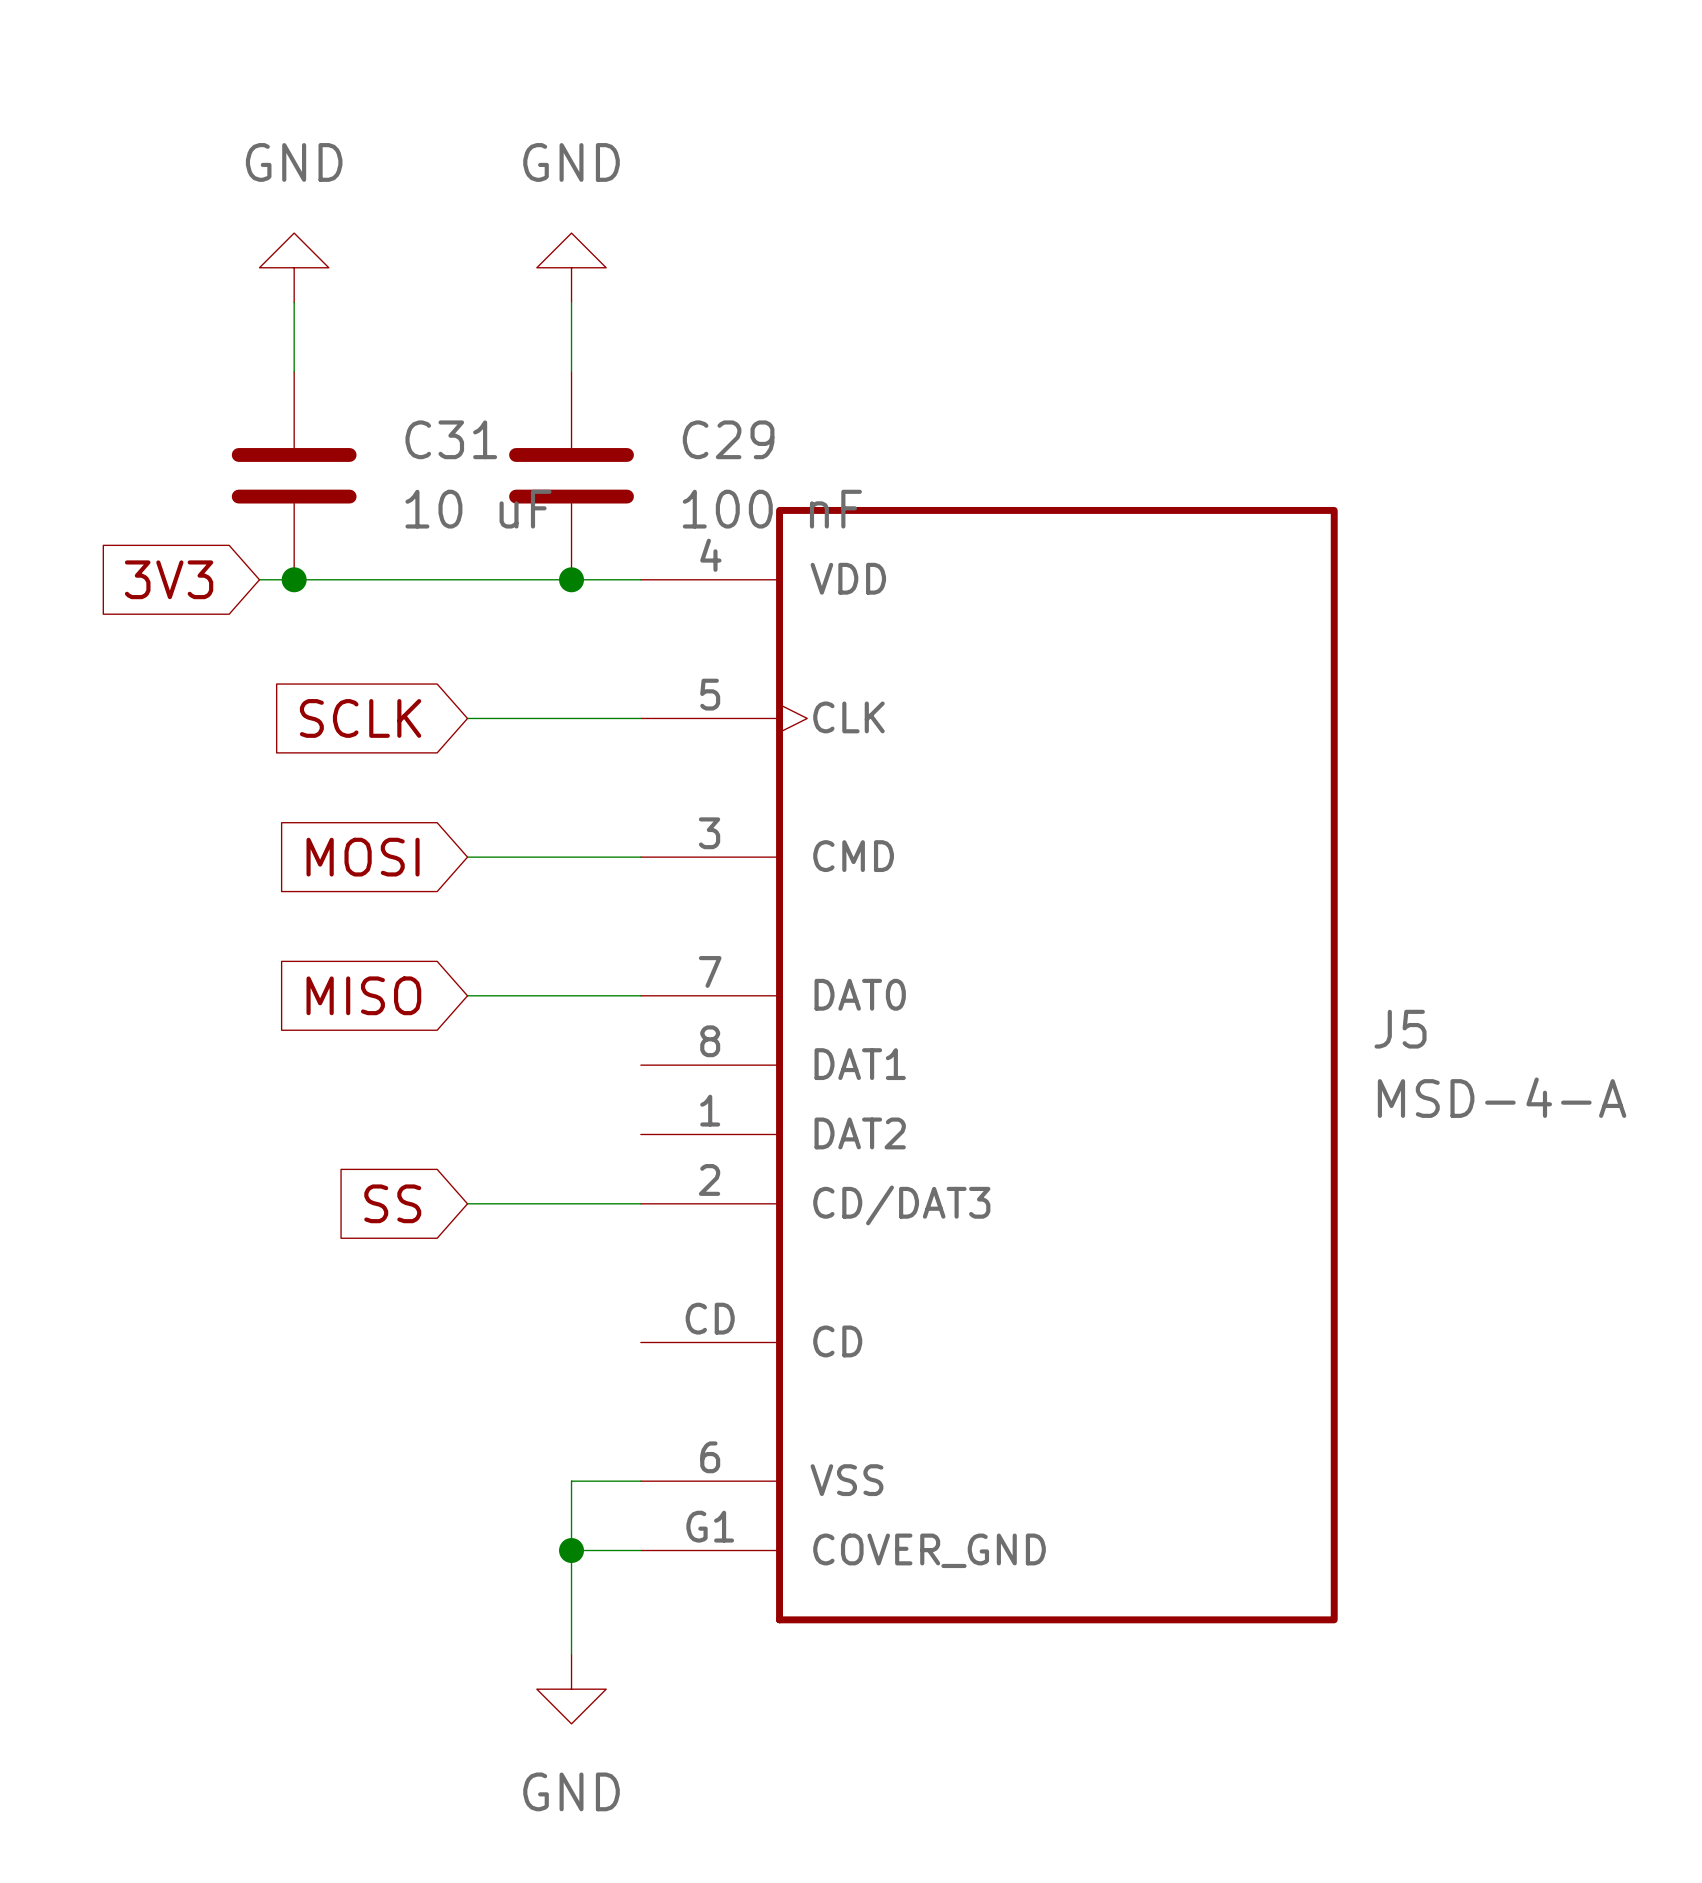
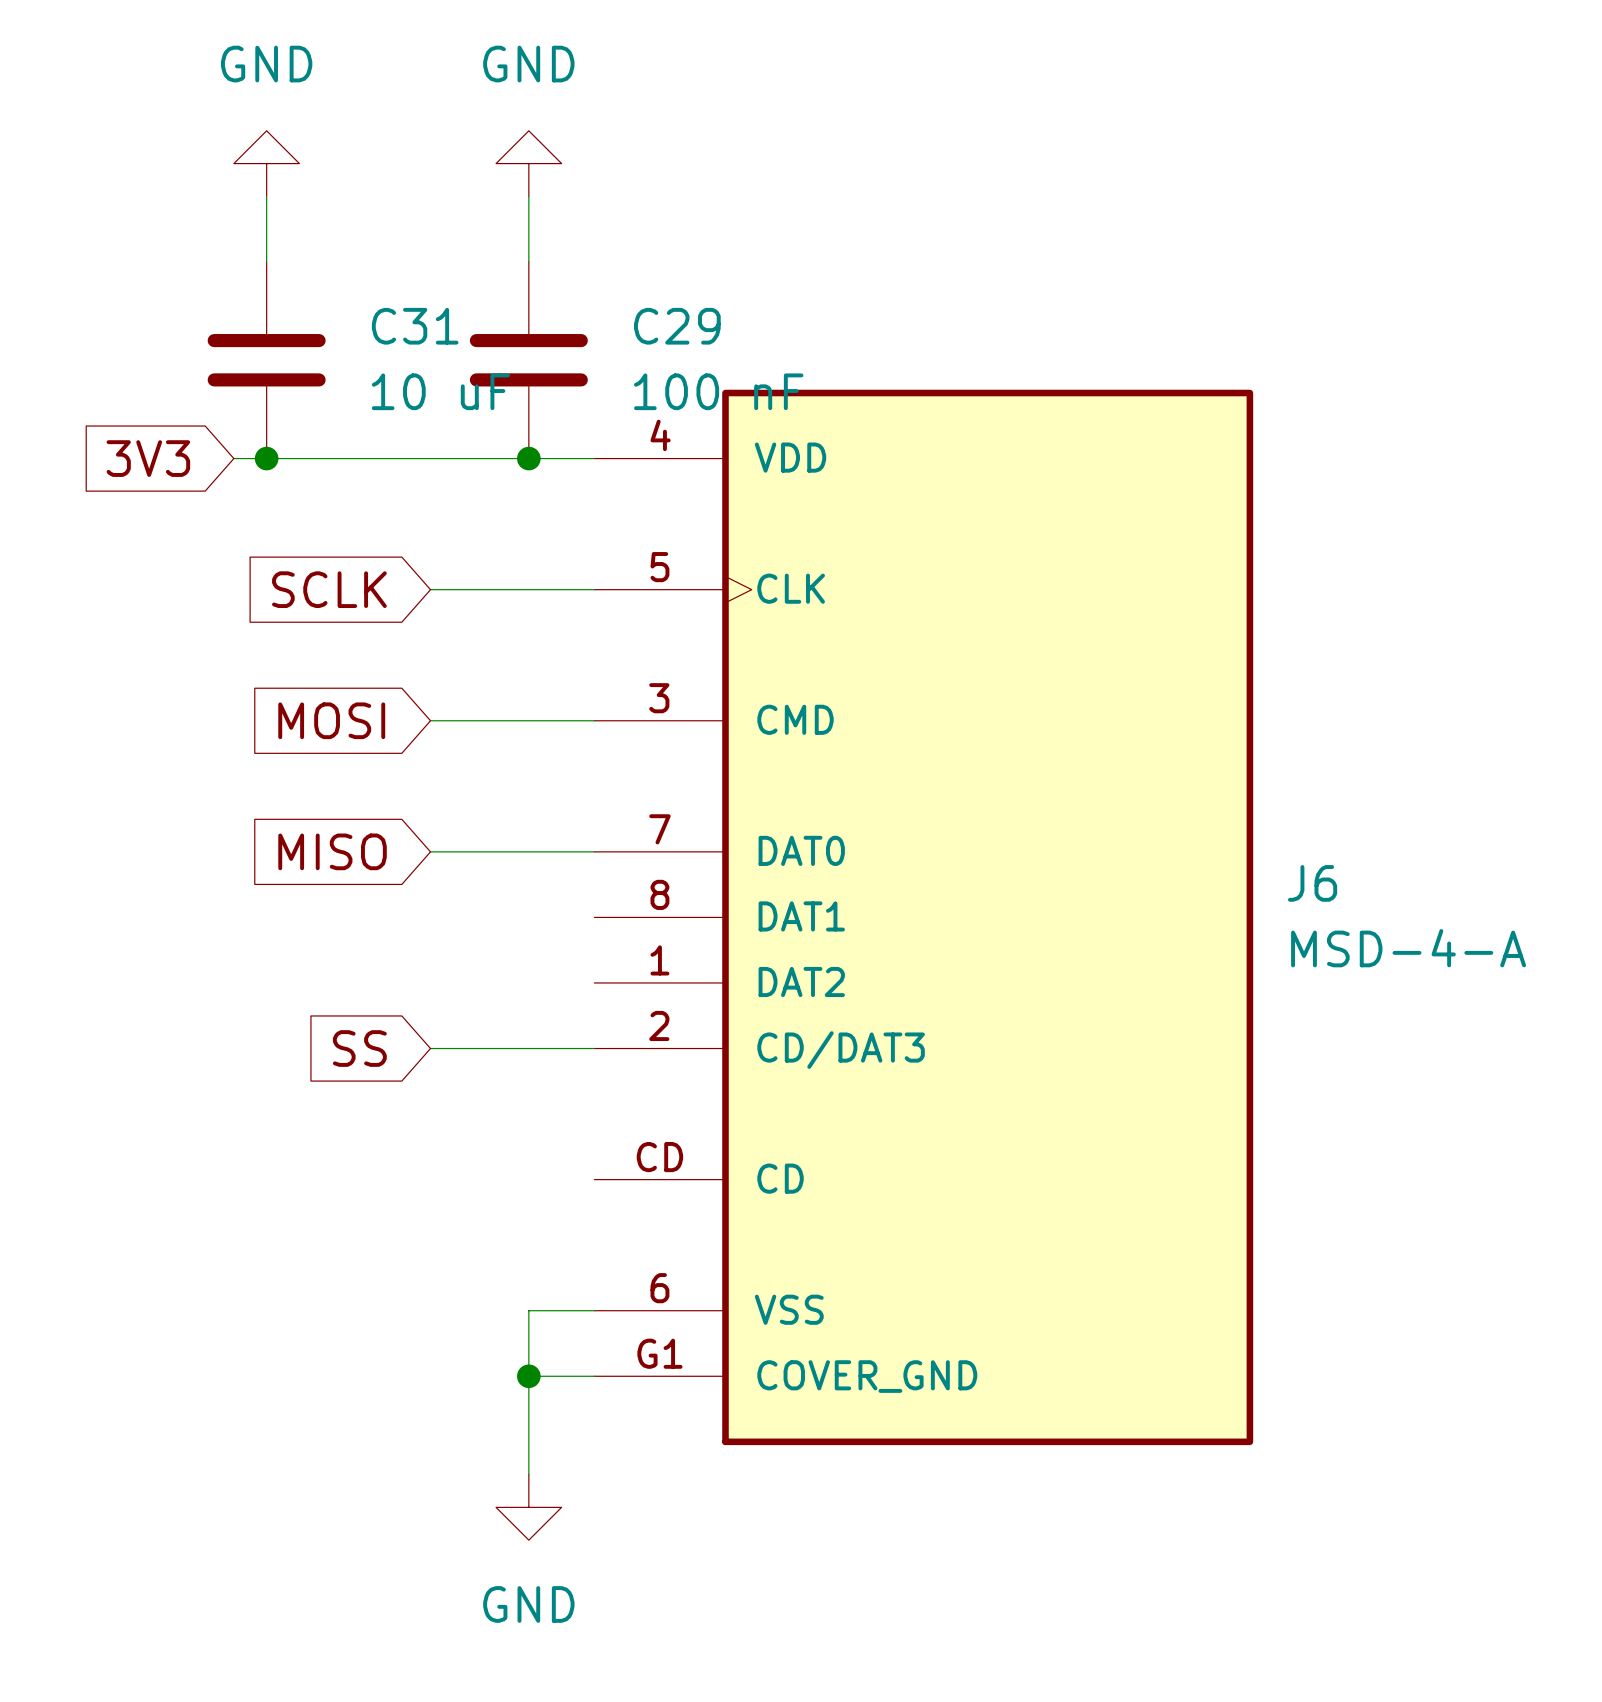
J5 name: J5 (1400, 1029) -> J6 (1312, 883)

